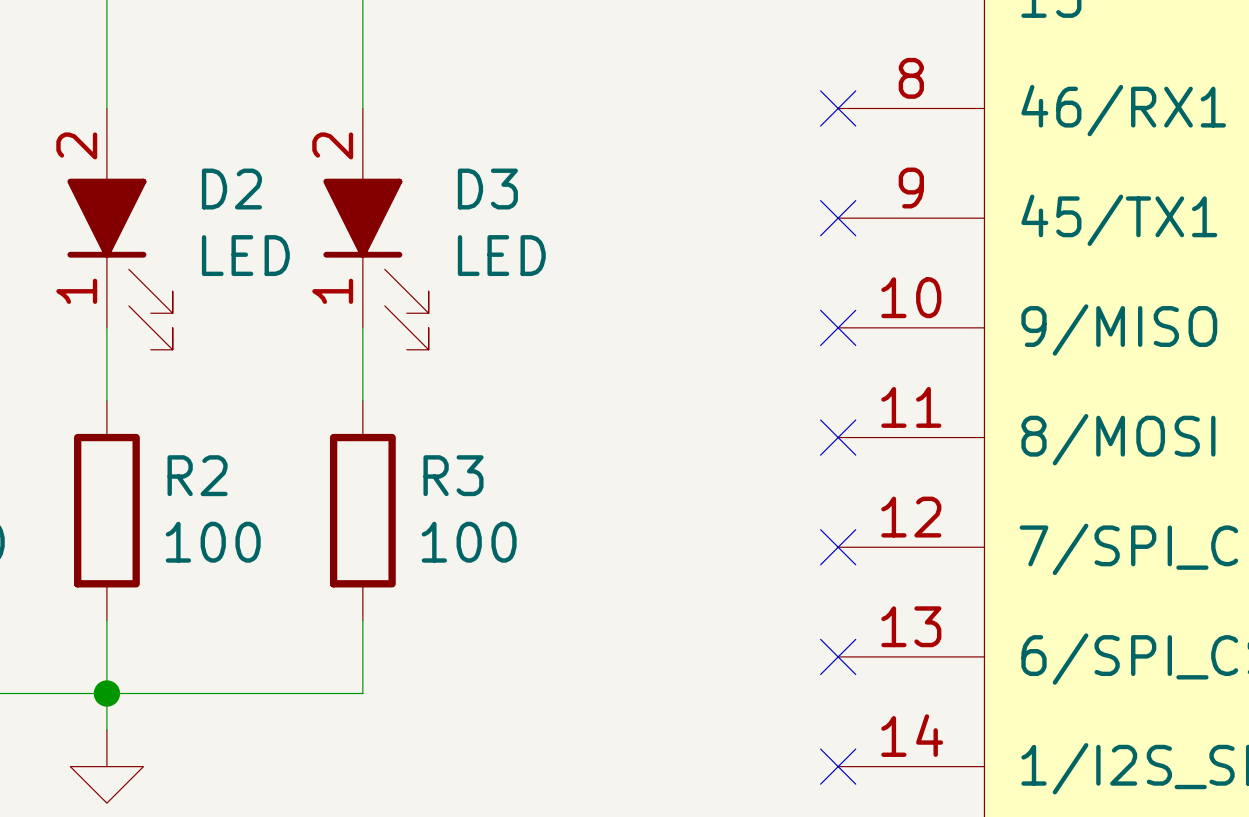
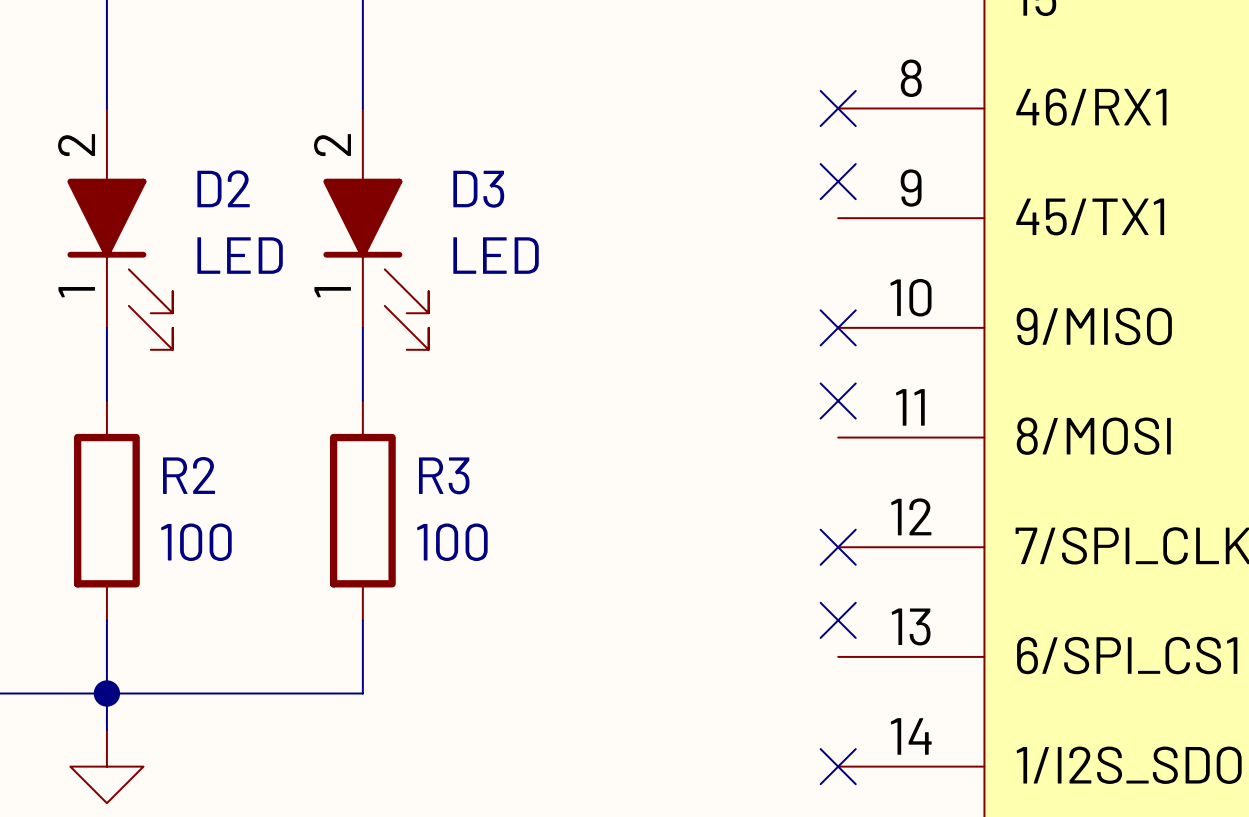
no-connect mark position: (838, 218) -> (838, 181)
no-connect mark position: (838, 437) -> (838, 400)
no-connect mark position: (838, 656) -> (838, 620)

